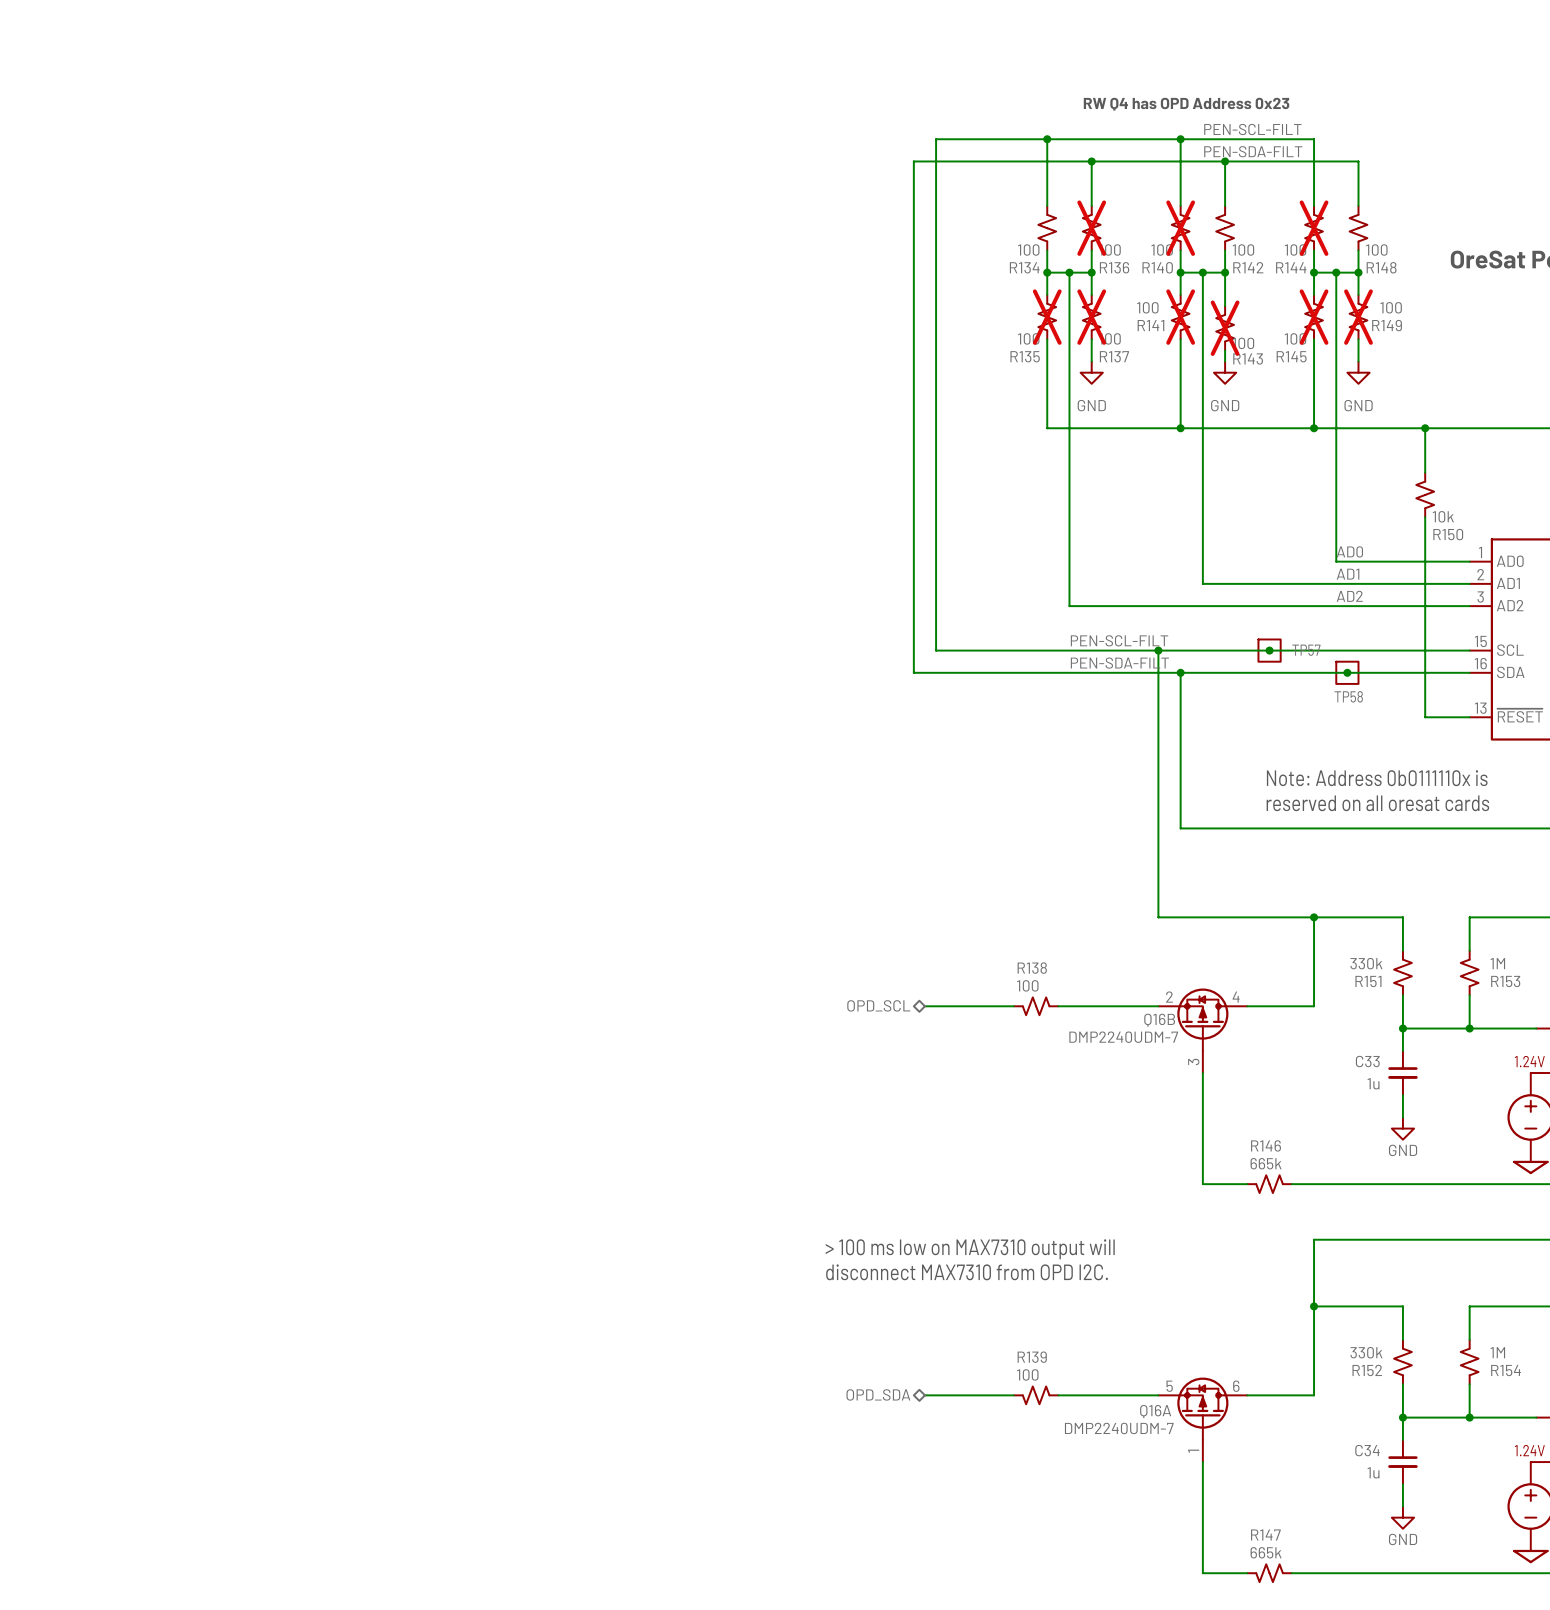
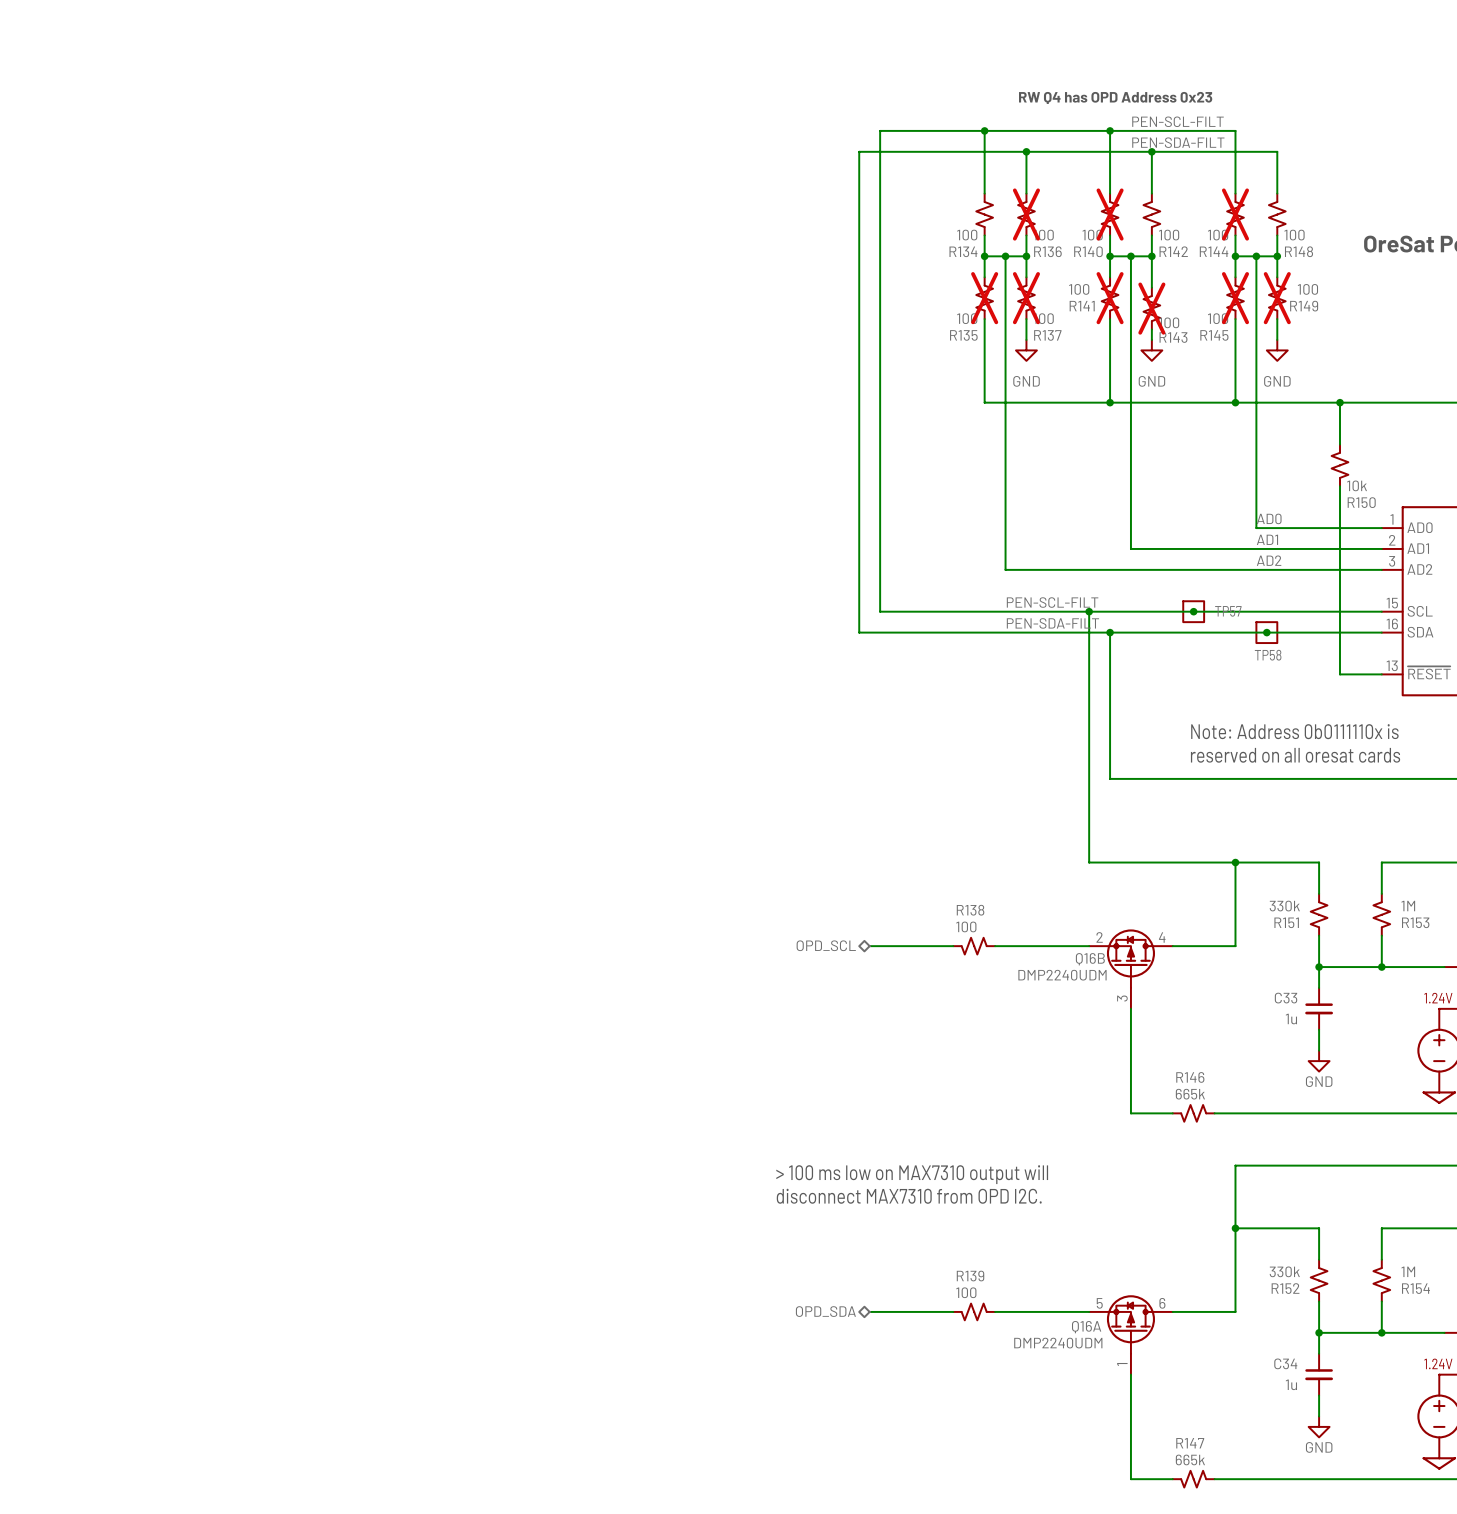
Q16B value: DMP2240UDM-7 (1123, 1037) -> DMP2240UDM (1062, 975)
Q16A value: DMP2240UDM-7 (1119, 1428) -> DMP2240UDM (1058, 1343)

